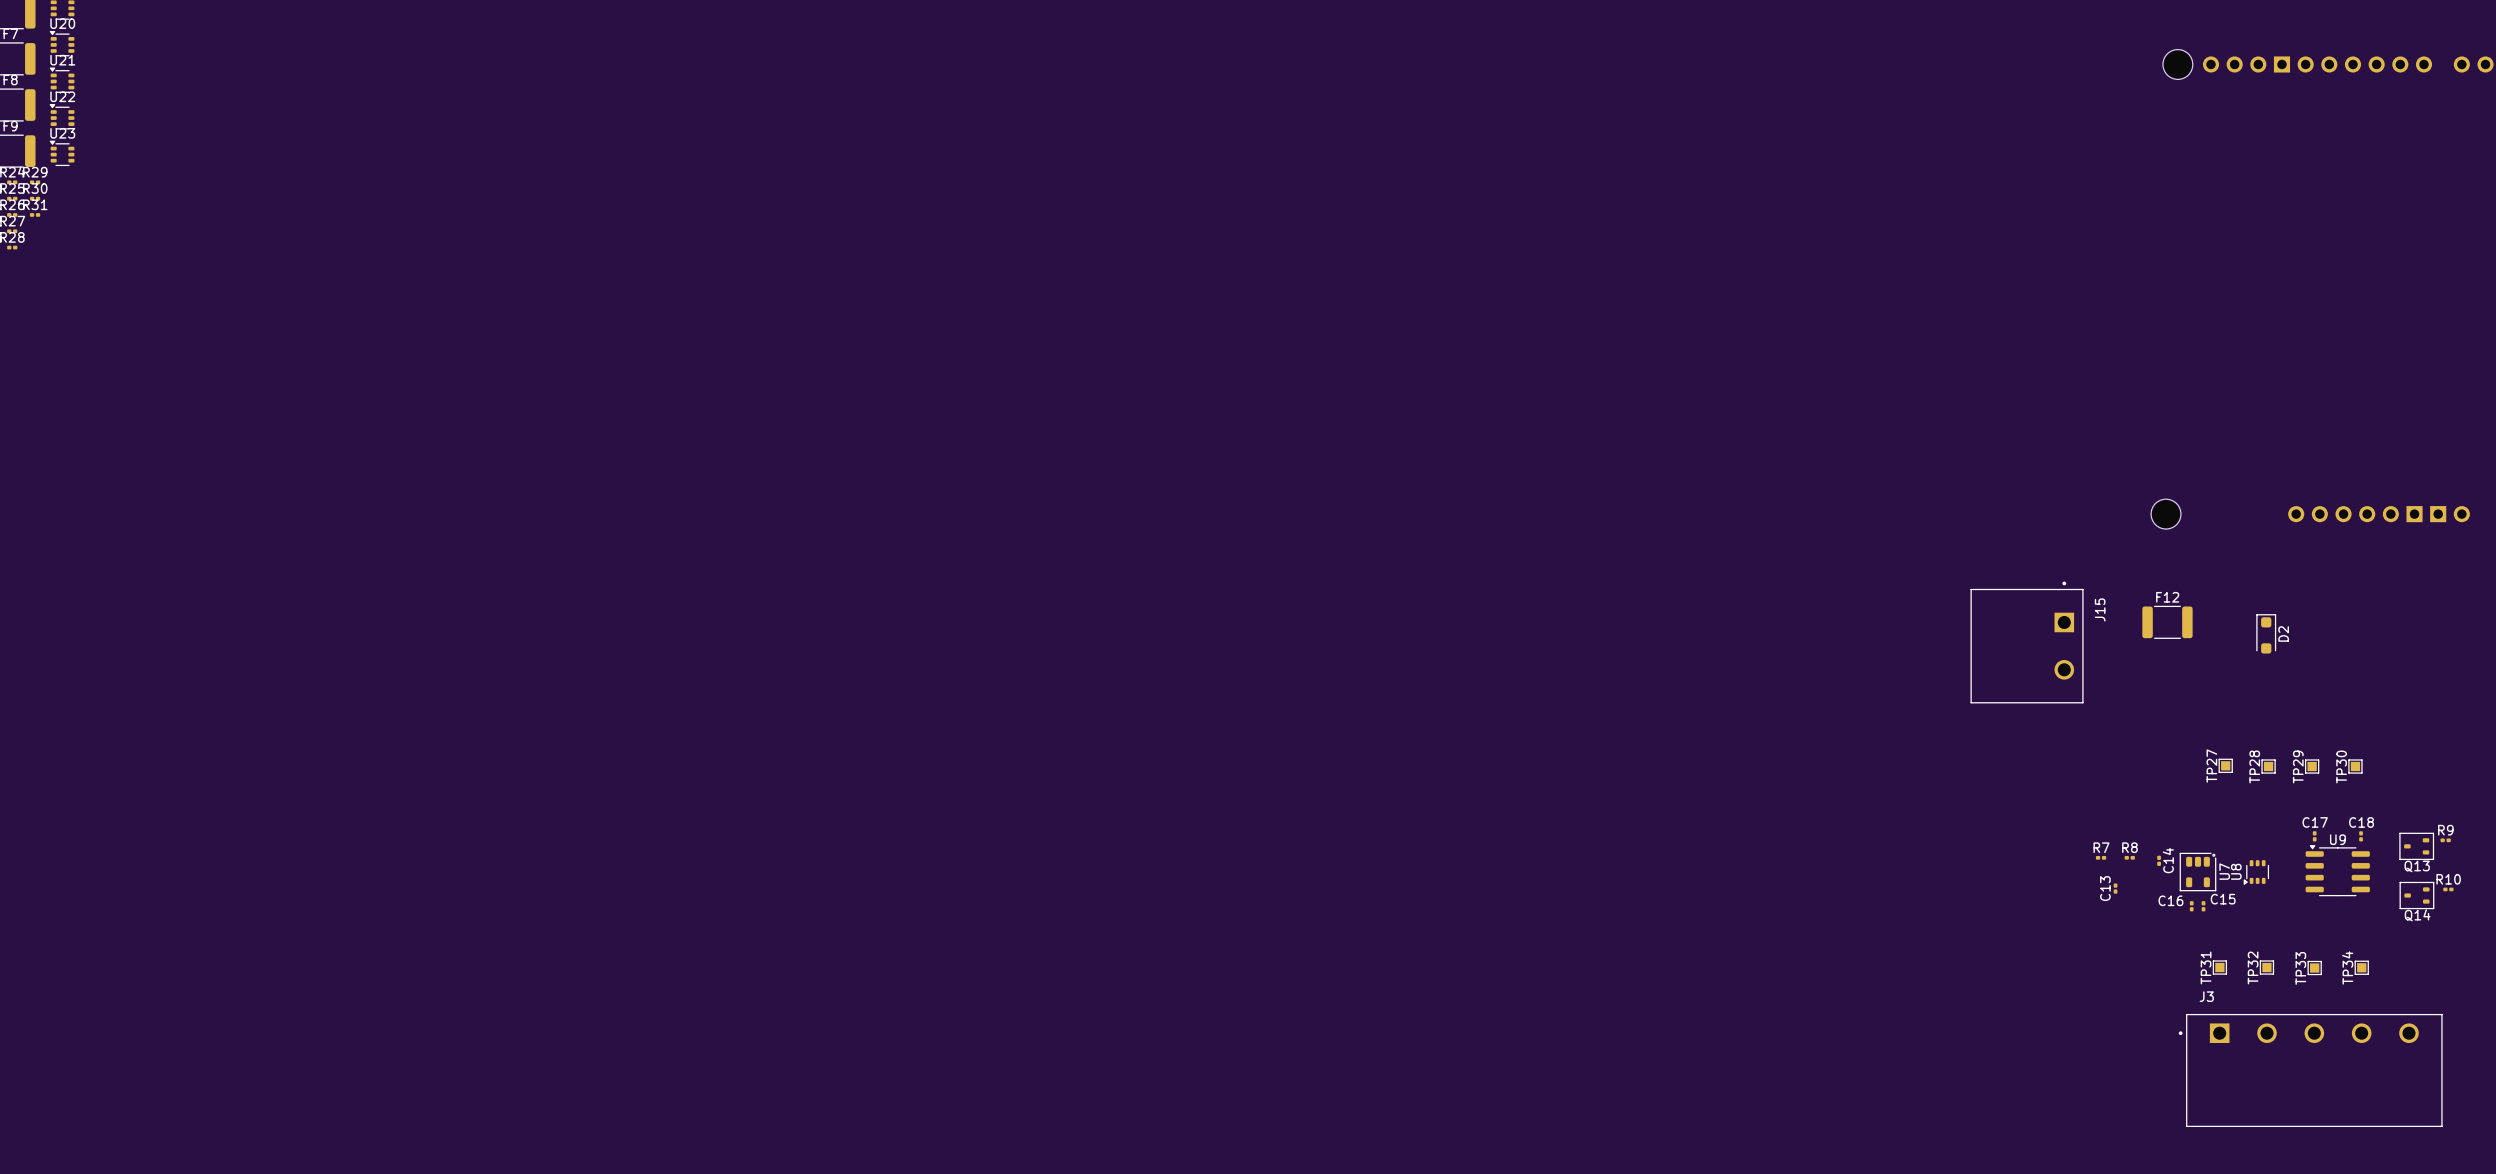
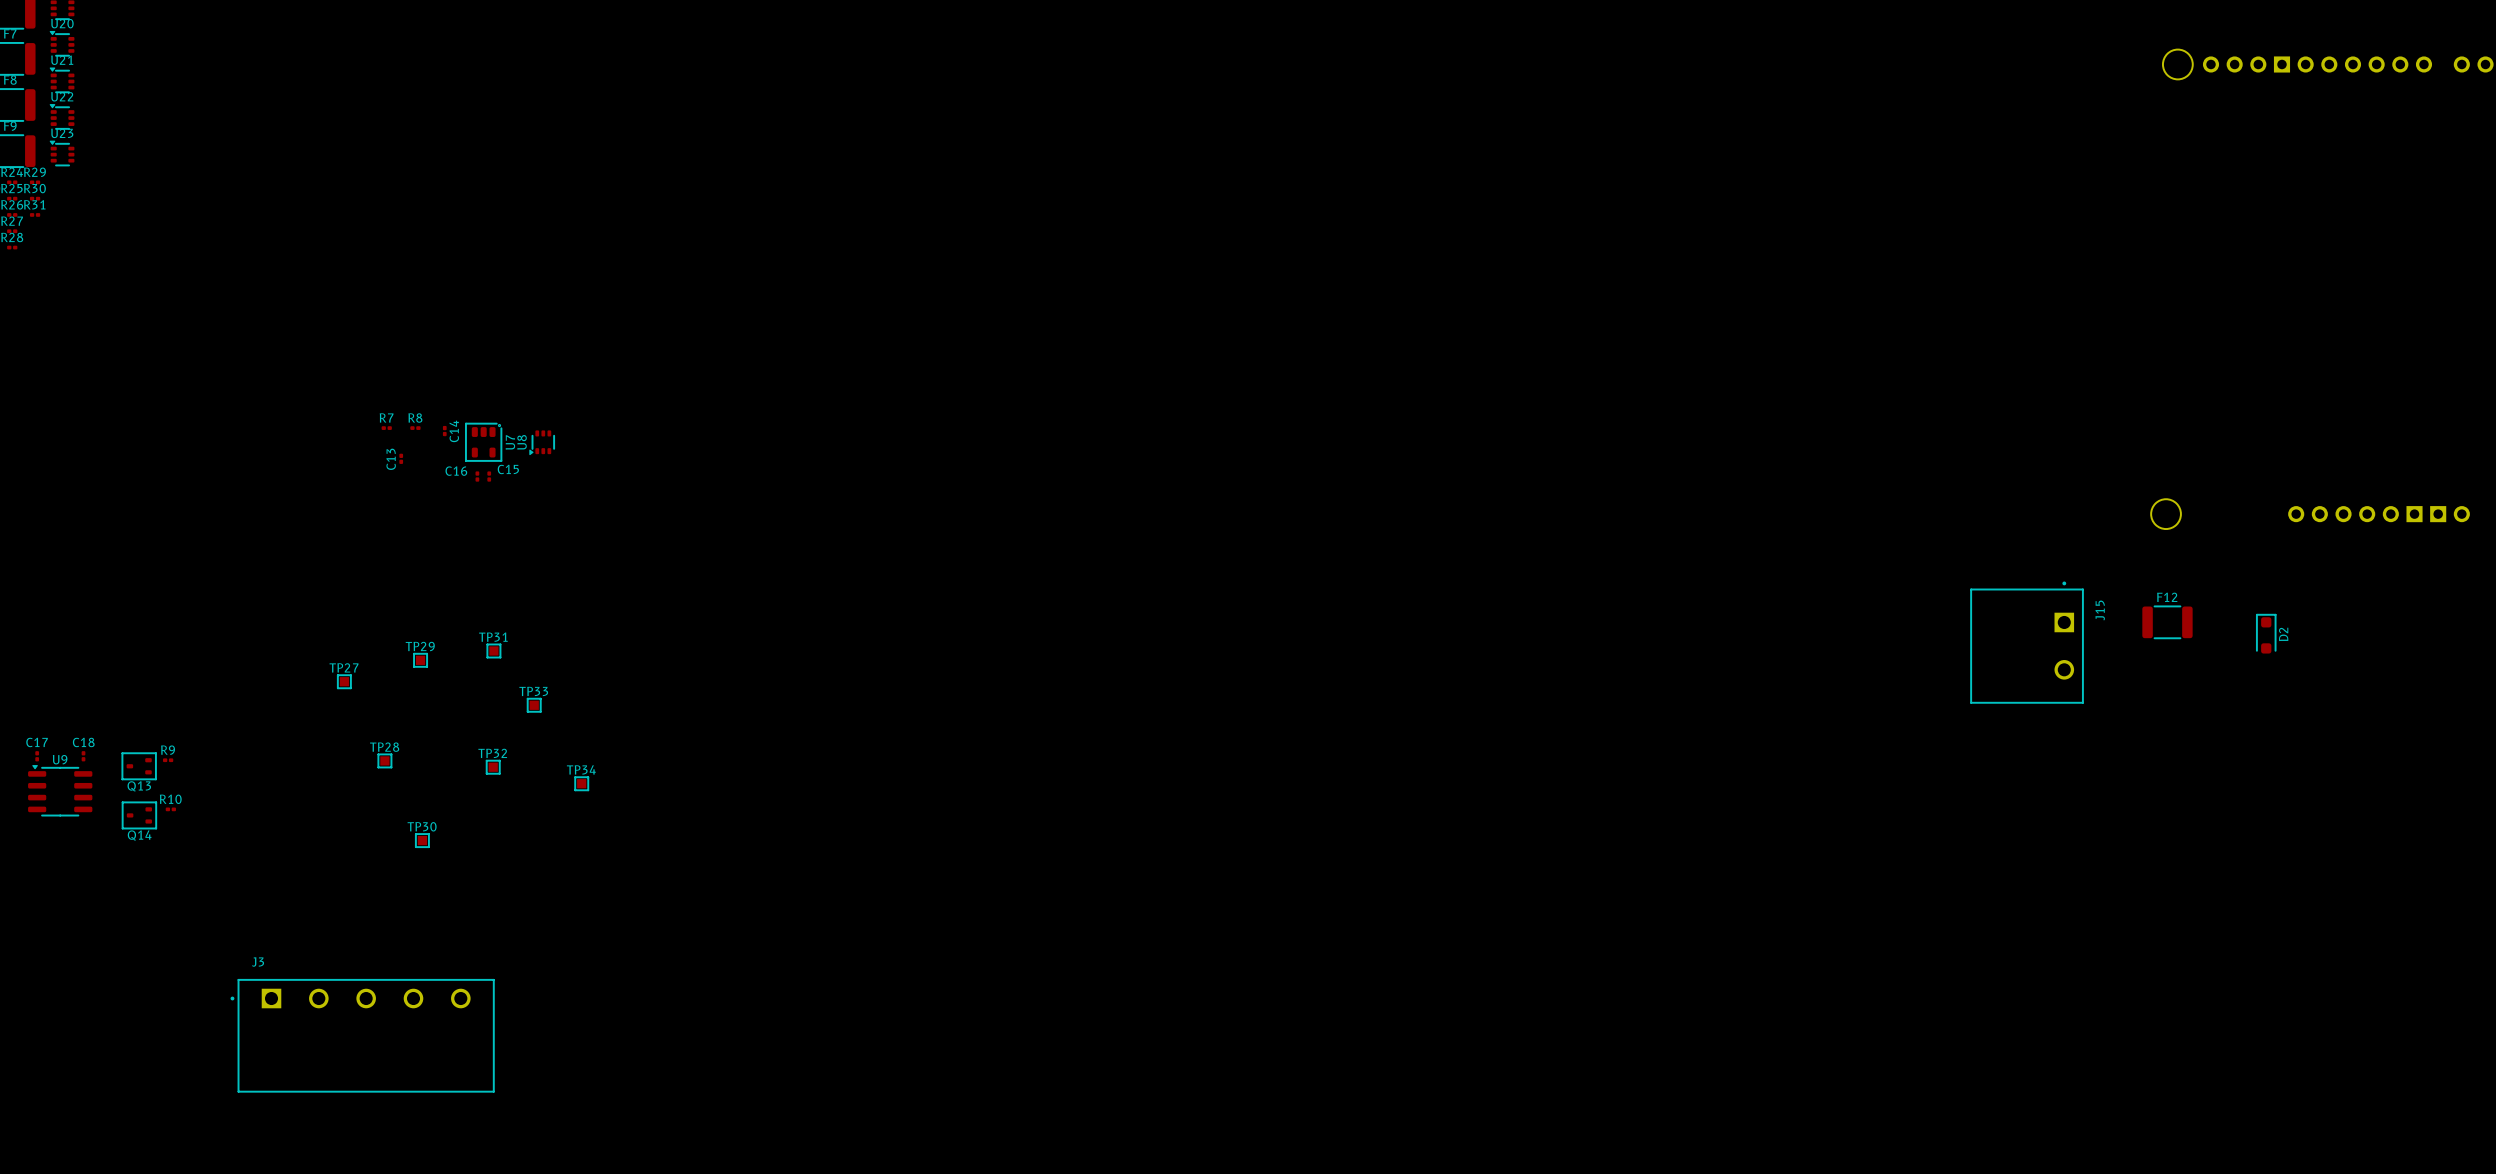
TP27 position: (2225, 765) -> (344, 681)
TP27 name rotation: 0° (2211, 766) -> 90° clockwise (344, 667)
TP28 name rotation: 0° (2254, 766) -> 90° clockwise (384, 747)
TP28 position: (2268, 766) -> (384, 760)
TP29 name rotation: 0° (2298, 766) -> 90° clockwise (420, 646)
TP29 position: (2312, 766) -> (420, 660)
TP30 name rotation: 0° (2341, 766) -> 90° clockwise (422, 826)
TP30 position: (2355, 766) -> (422, 840)
C17 position: (2314, 836) -> (37, 756)
C18 position: (2361, 836) -> (83, 756)
R9 position: (2445, 840) -> (168, 760)
Q13 position: (2416, 846) -> (139, 766)
R7 position: (2101, 857) -> (386, 428)
R8 position: (2129, 857) -> (415, 428)
C14 position: (2159, 860) -> (444, 431)
U9 position: (2337, 870) -> (60, 790)
U7 position: (2197, 872) -> (483, 442)
U8 position: (2256, 872) -> (542, 442)
C13 position: (2115, 888) -> (401, 458)
R10 position: (2448, 889) -> (170, 809)
Q14 position: (2416, 895) -> (139, 815)
C16 position: (2191, 906) -> (477, 476)
C15 position: (2203, 906) -> (489, 476)
TP31 name rotation: 0° (2206, 967) -> 90° clockwise (493, 637)
TP31 position: (2219, 967) -> (493, 650)
TP32 name rotation: 0° (2253, 967) -> 90° clockwise (492, 753)
TP32 position: (2266, 967) -> (493, 767)
TP34 name rotation: 0° (2347, 967) -> 90° clockwise (581, 769)
TP34 position: (2361, 967) -> (581, 783)
TP33 name rotation: 0° (2300, 968) -> 90° clockwise (533, 691)
TP33 position: (2314, 968) -> (534, 705)
J3 position: (2310, 1070) -> (362, 1035)

